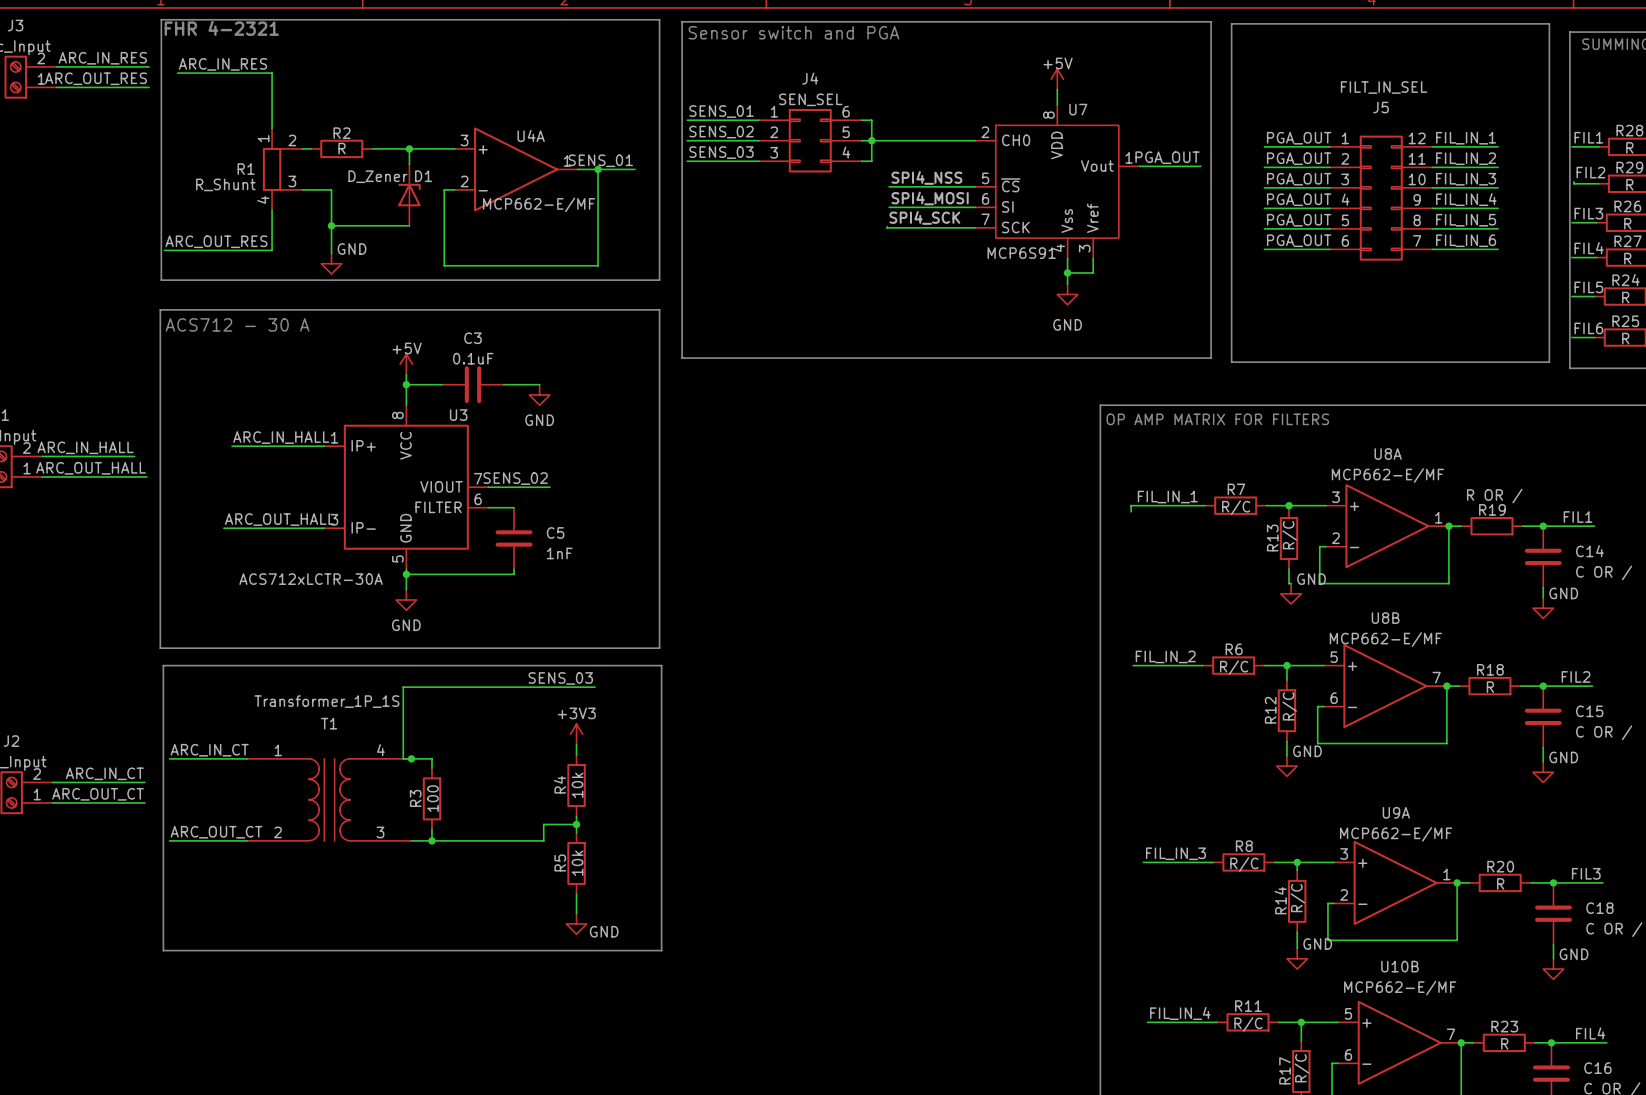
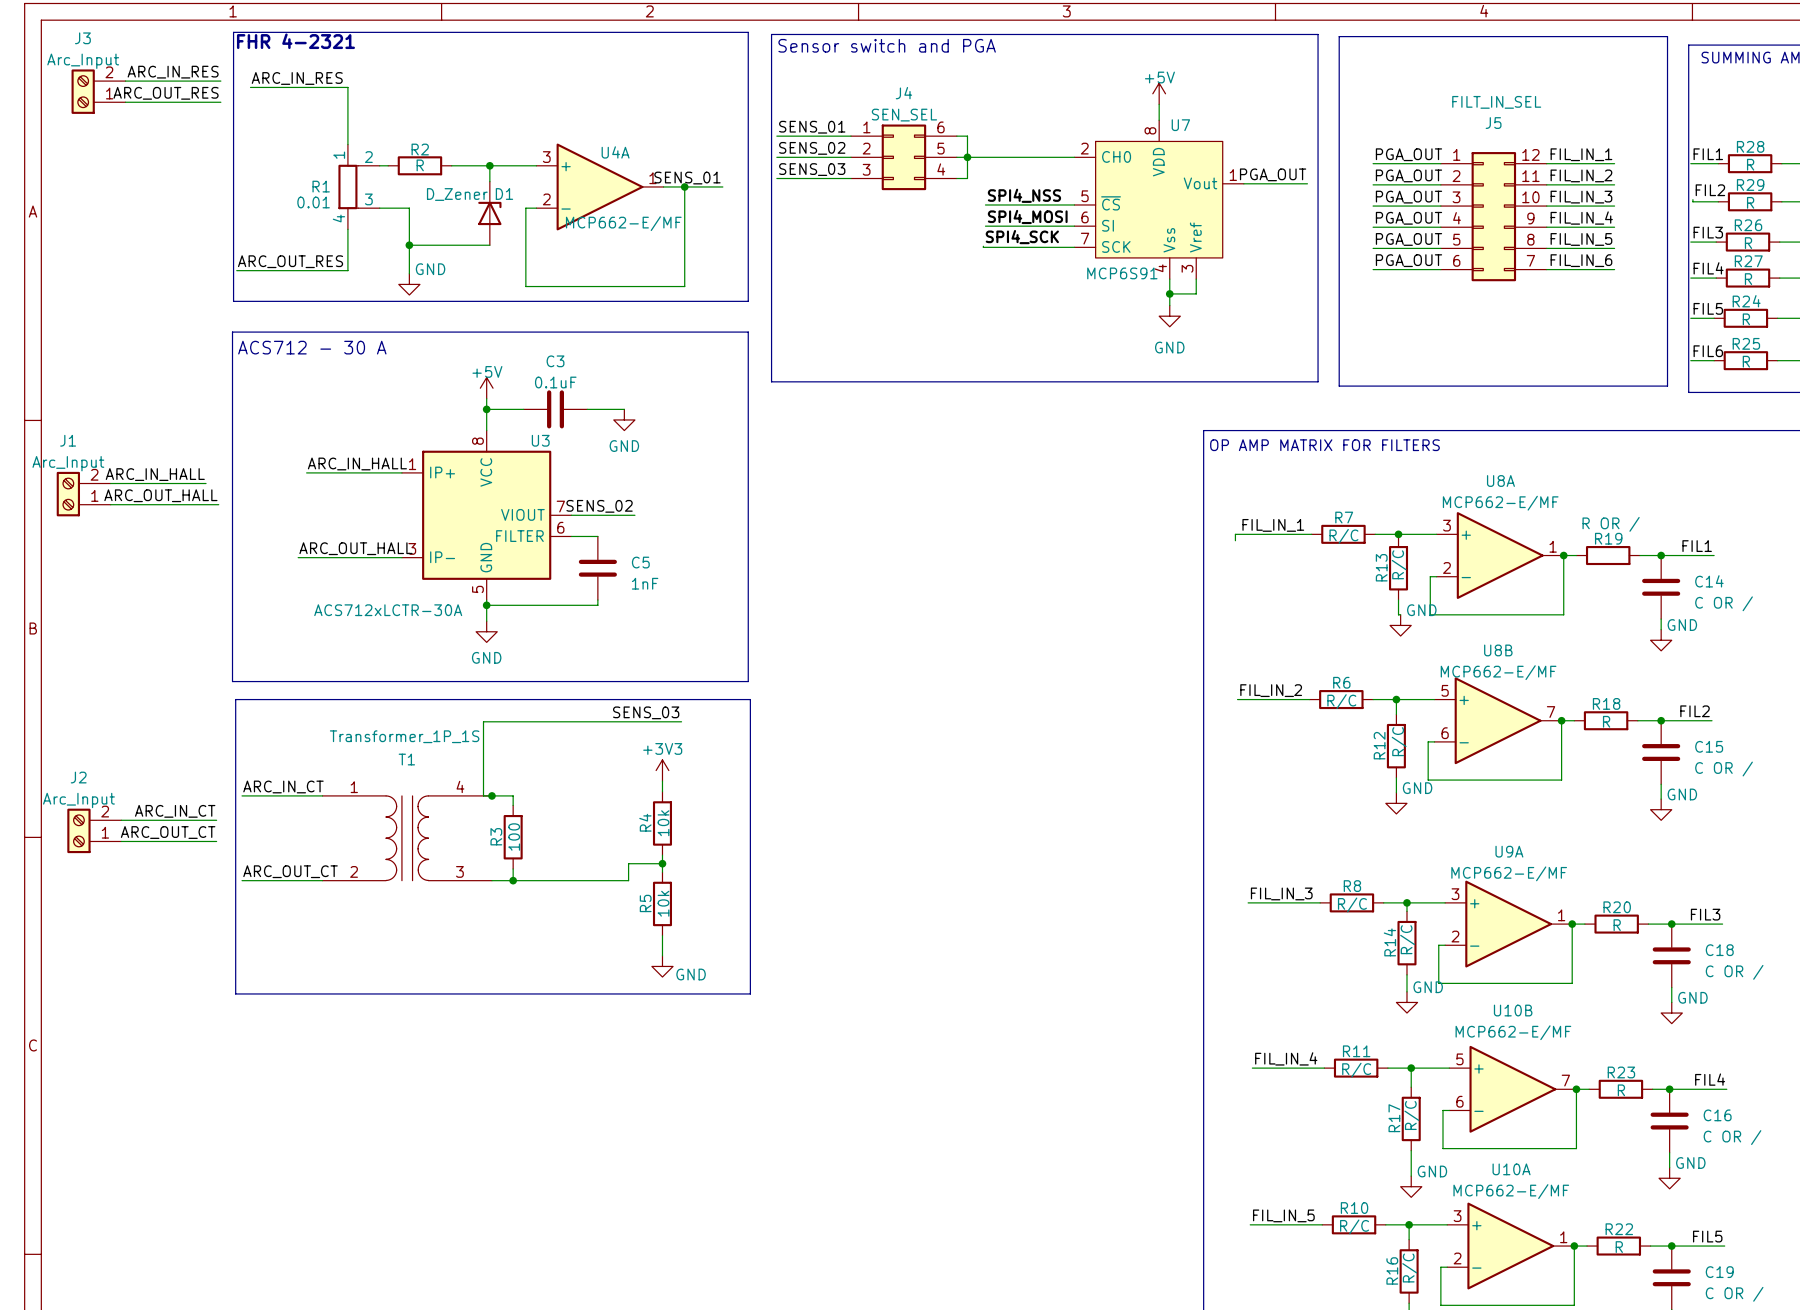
R1 value: R_Shunt (225, 184) -> 0.01 (313, 202)

